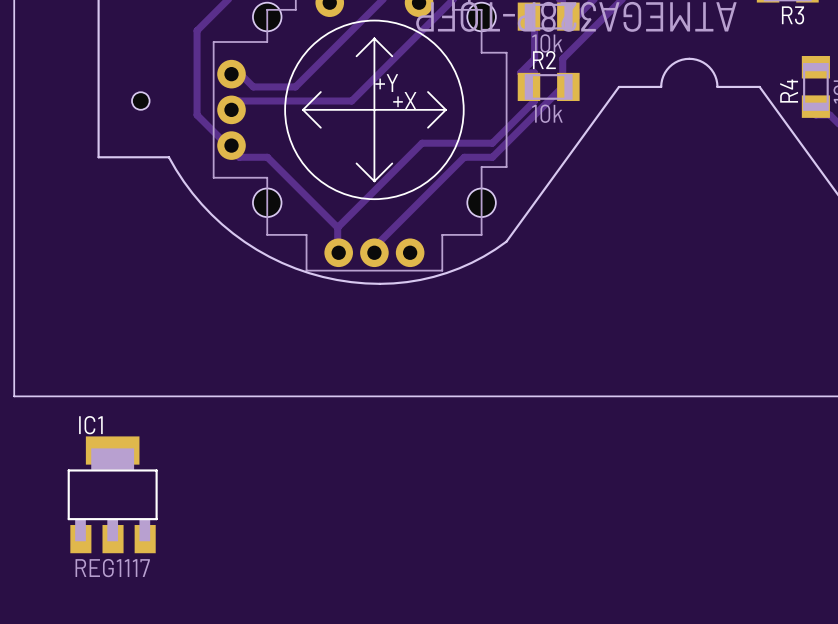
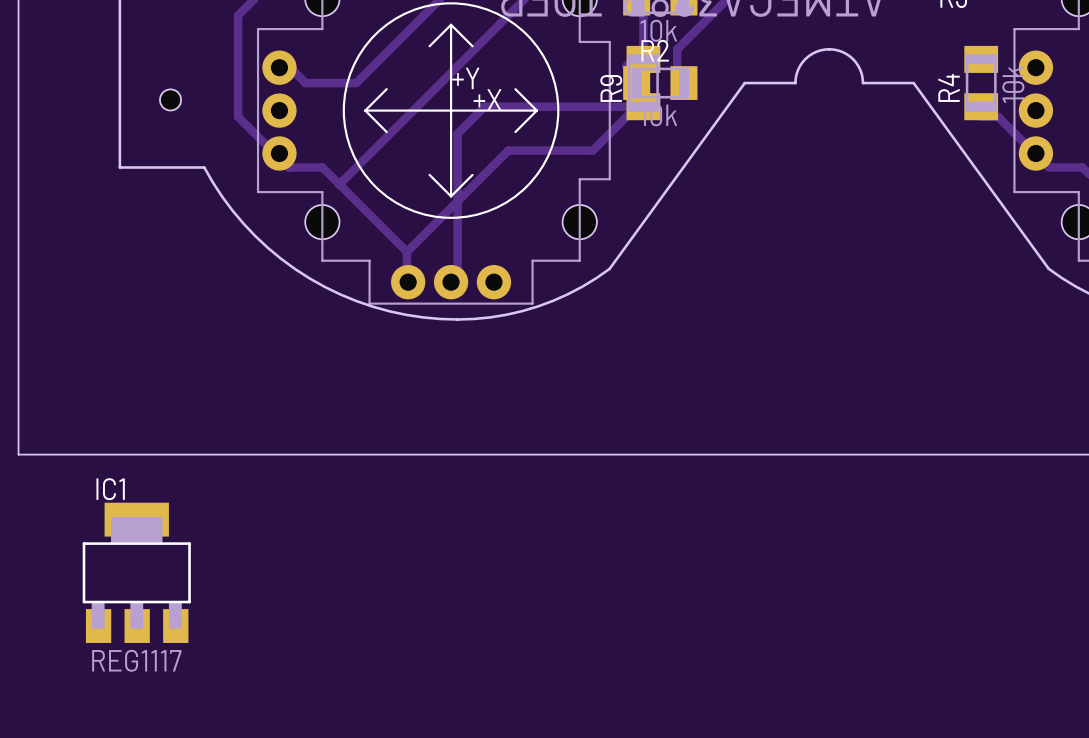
R9: none -> (643, 83)
track: (562, 86) (492, 157) (464, 157) (379, 241) (374, 252) -> (643, 106) (484, 106) (457, 133) (457, 275) (451, 282)
track: (351, 101) (239, 101) (231, 109) -> (423, 99) (339, 184)

